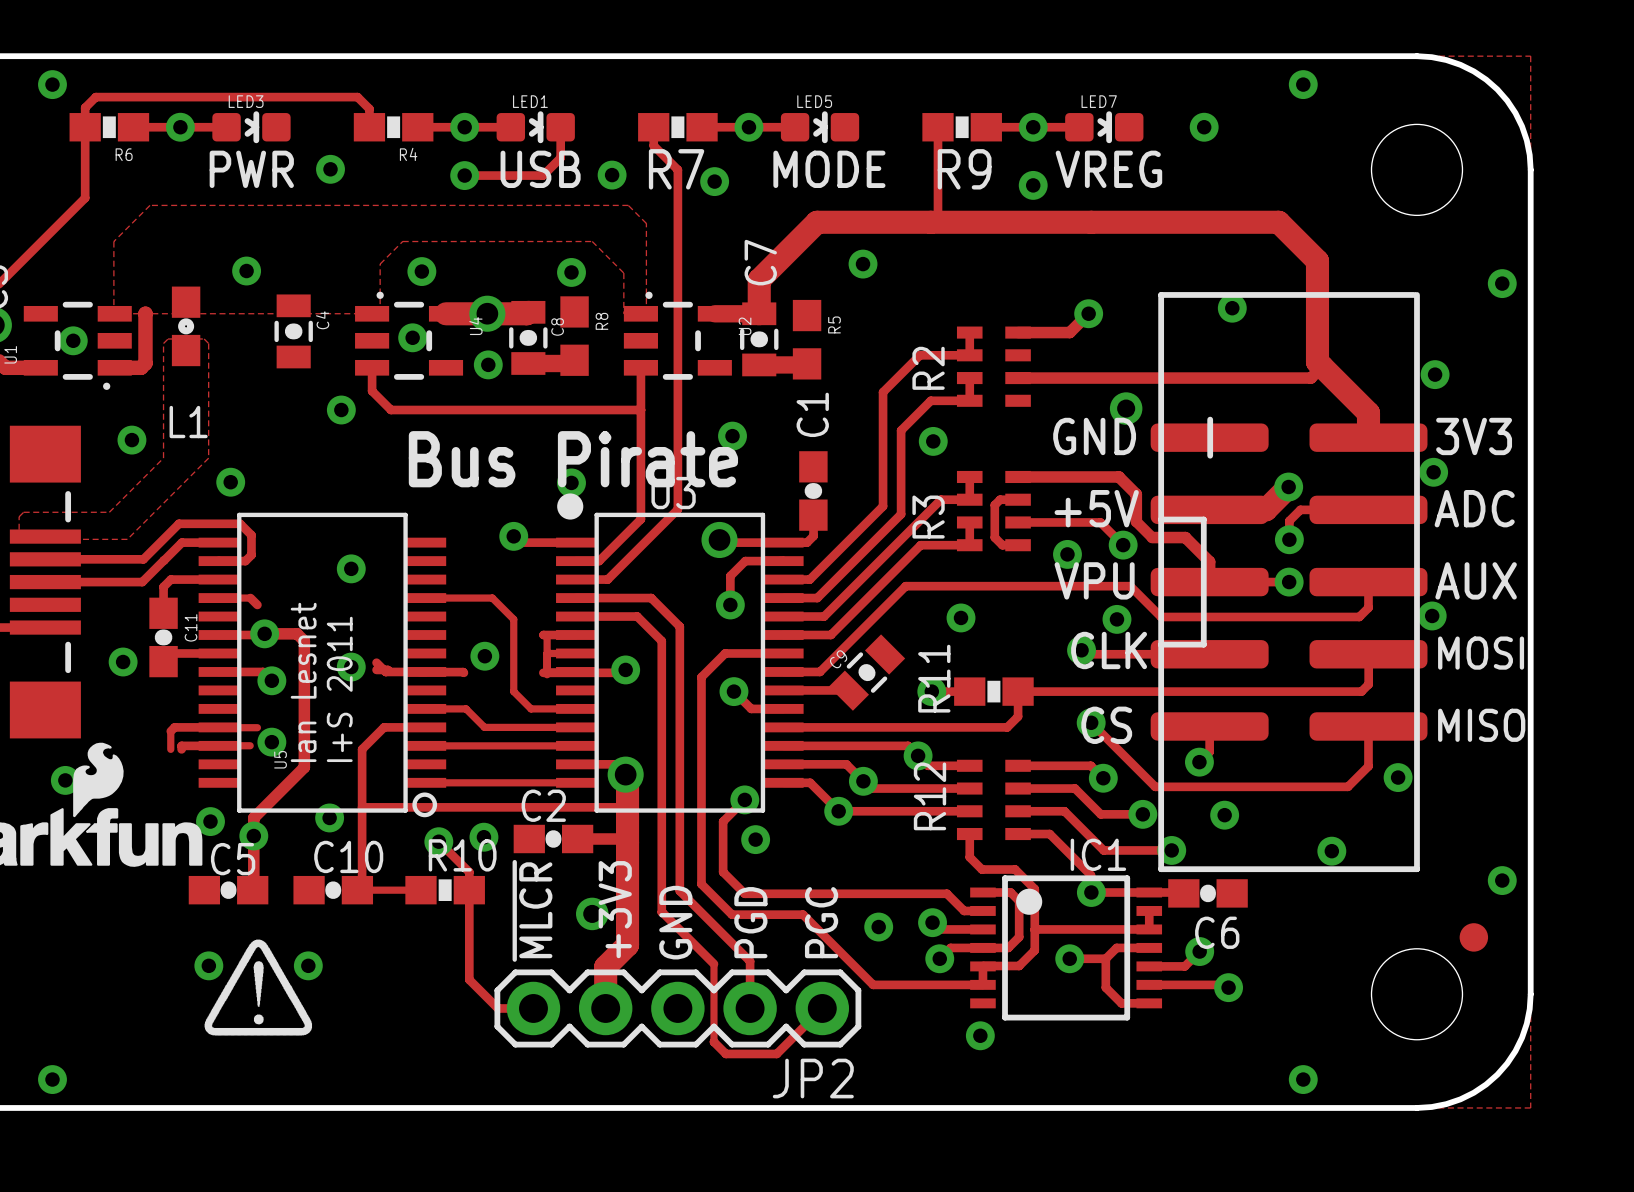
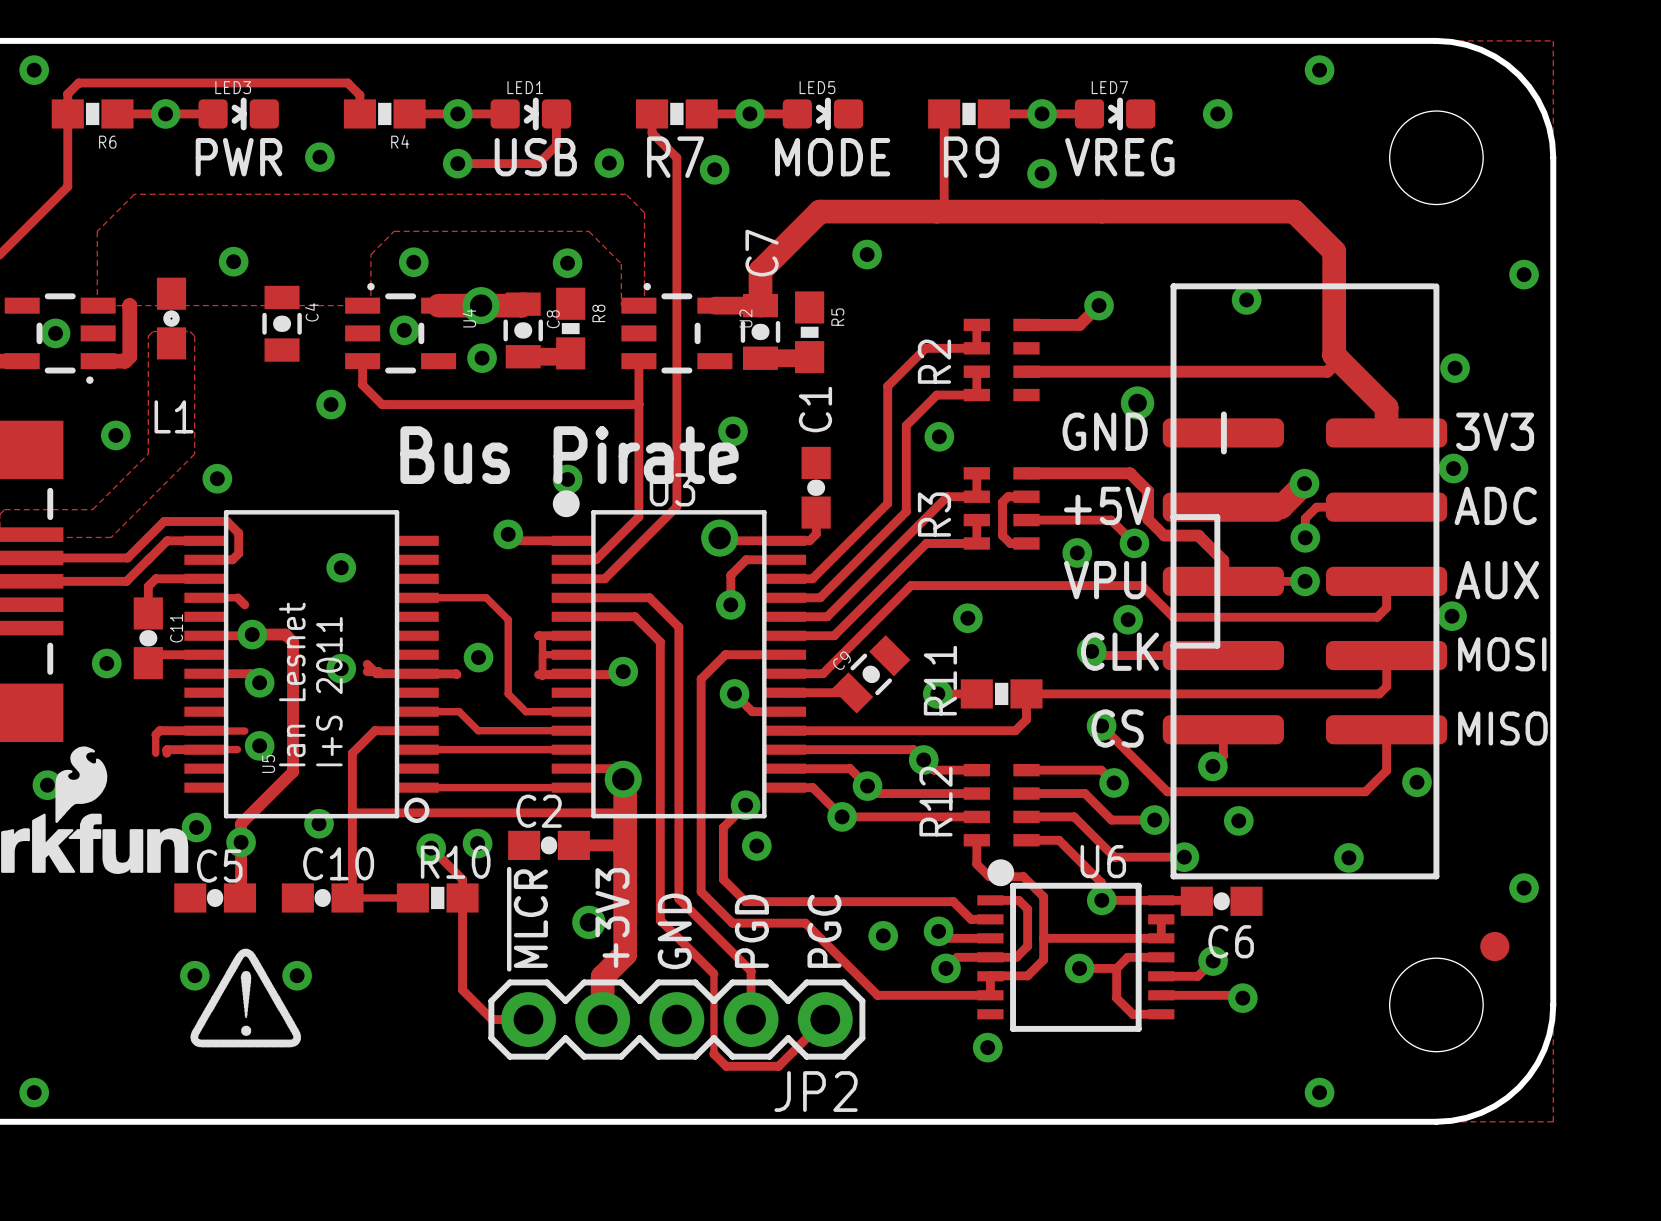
R8 footprint: [560, 296, 589, 376] -> [556, 287, 586, 370]
R5 footprint: [792, 299, 822, 380] -> [795, 291, 825, 374]
U6: none -> (1075, 945)
IC1: (1066, 947) -> none

